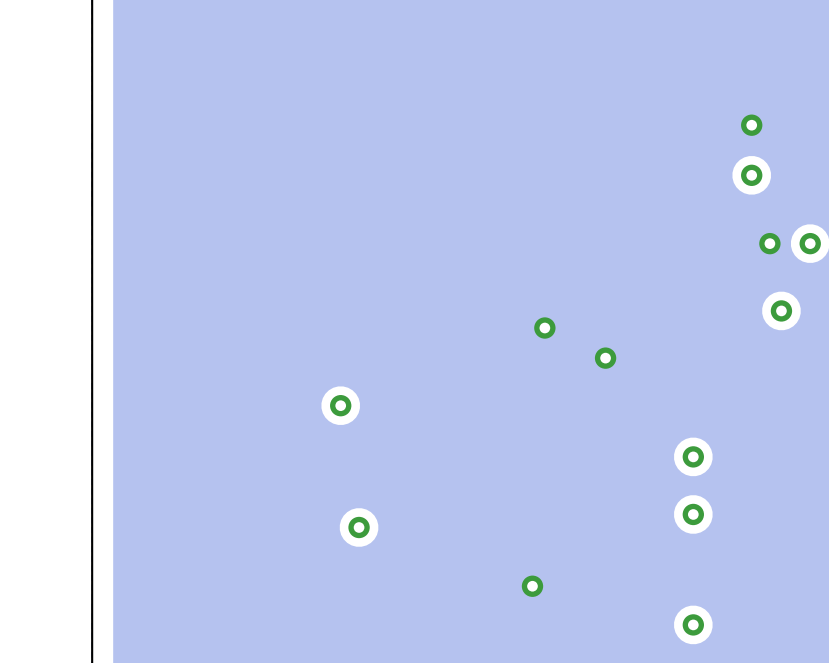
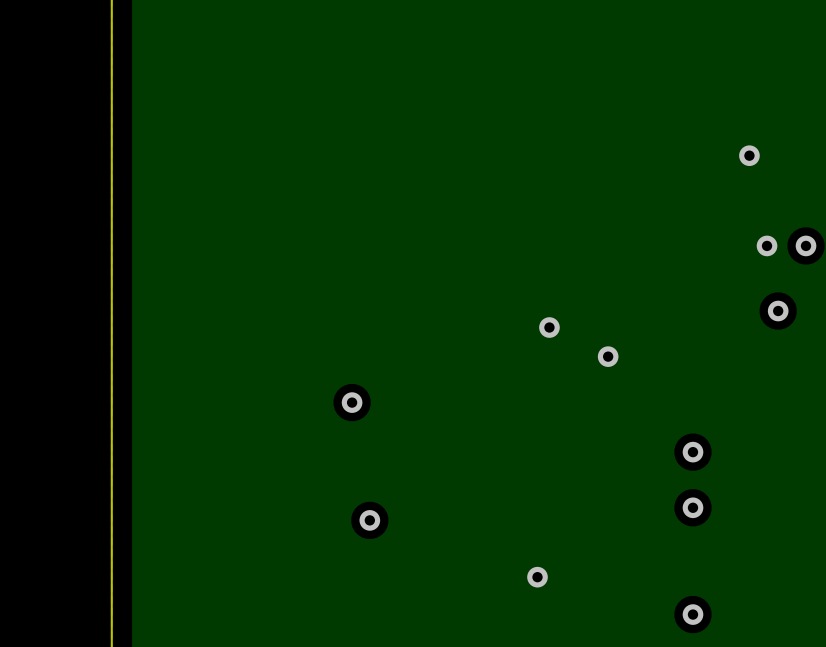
via: (751, 125) -> none
via: none -> (749, 155)
via: (751, 175) -> none

